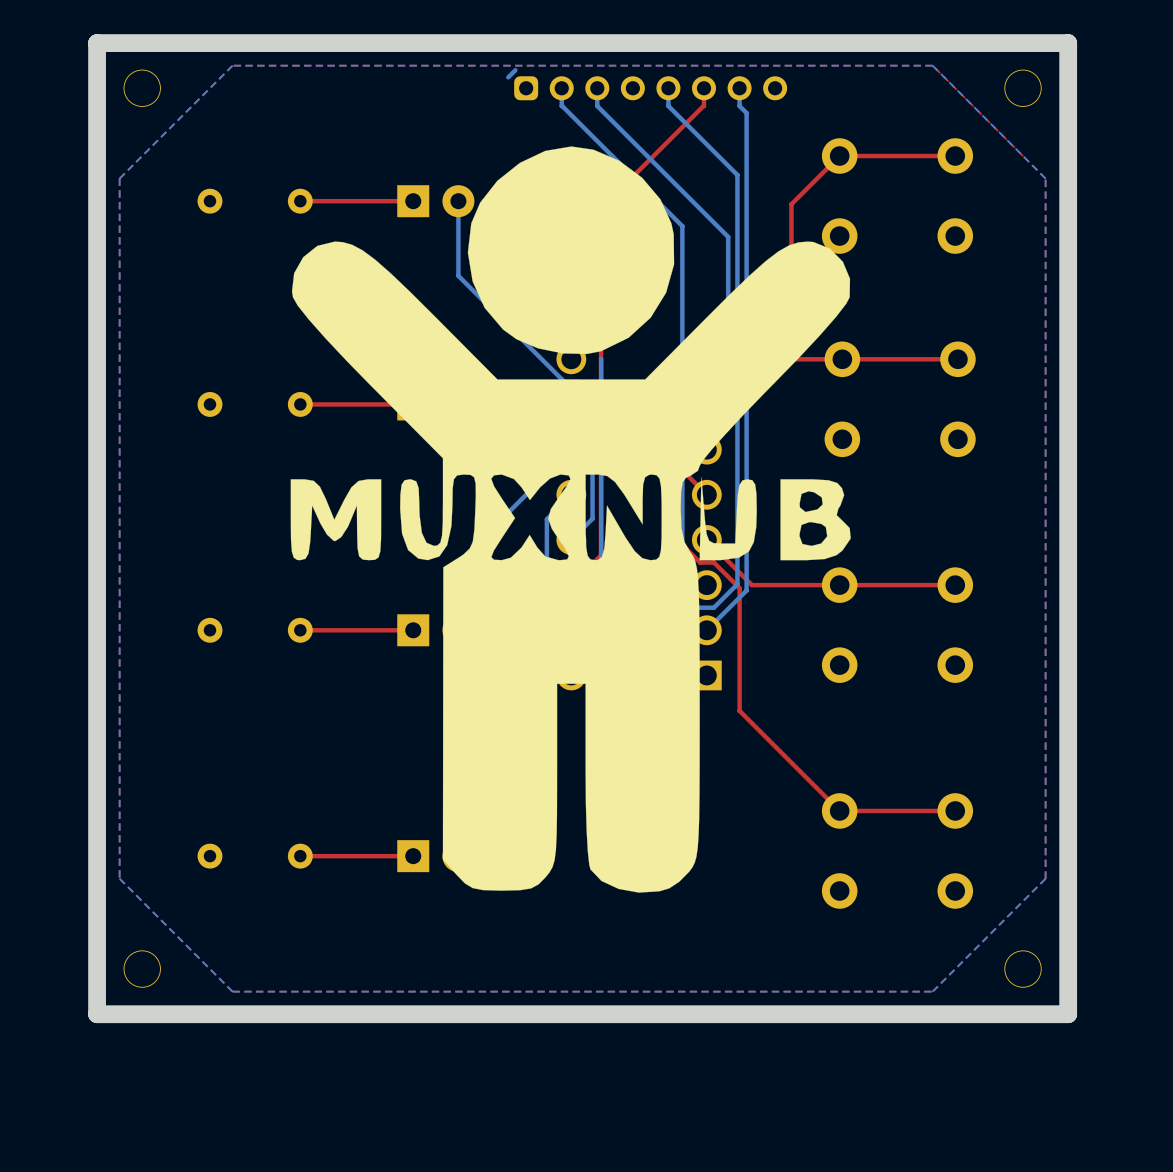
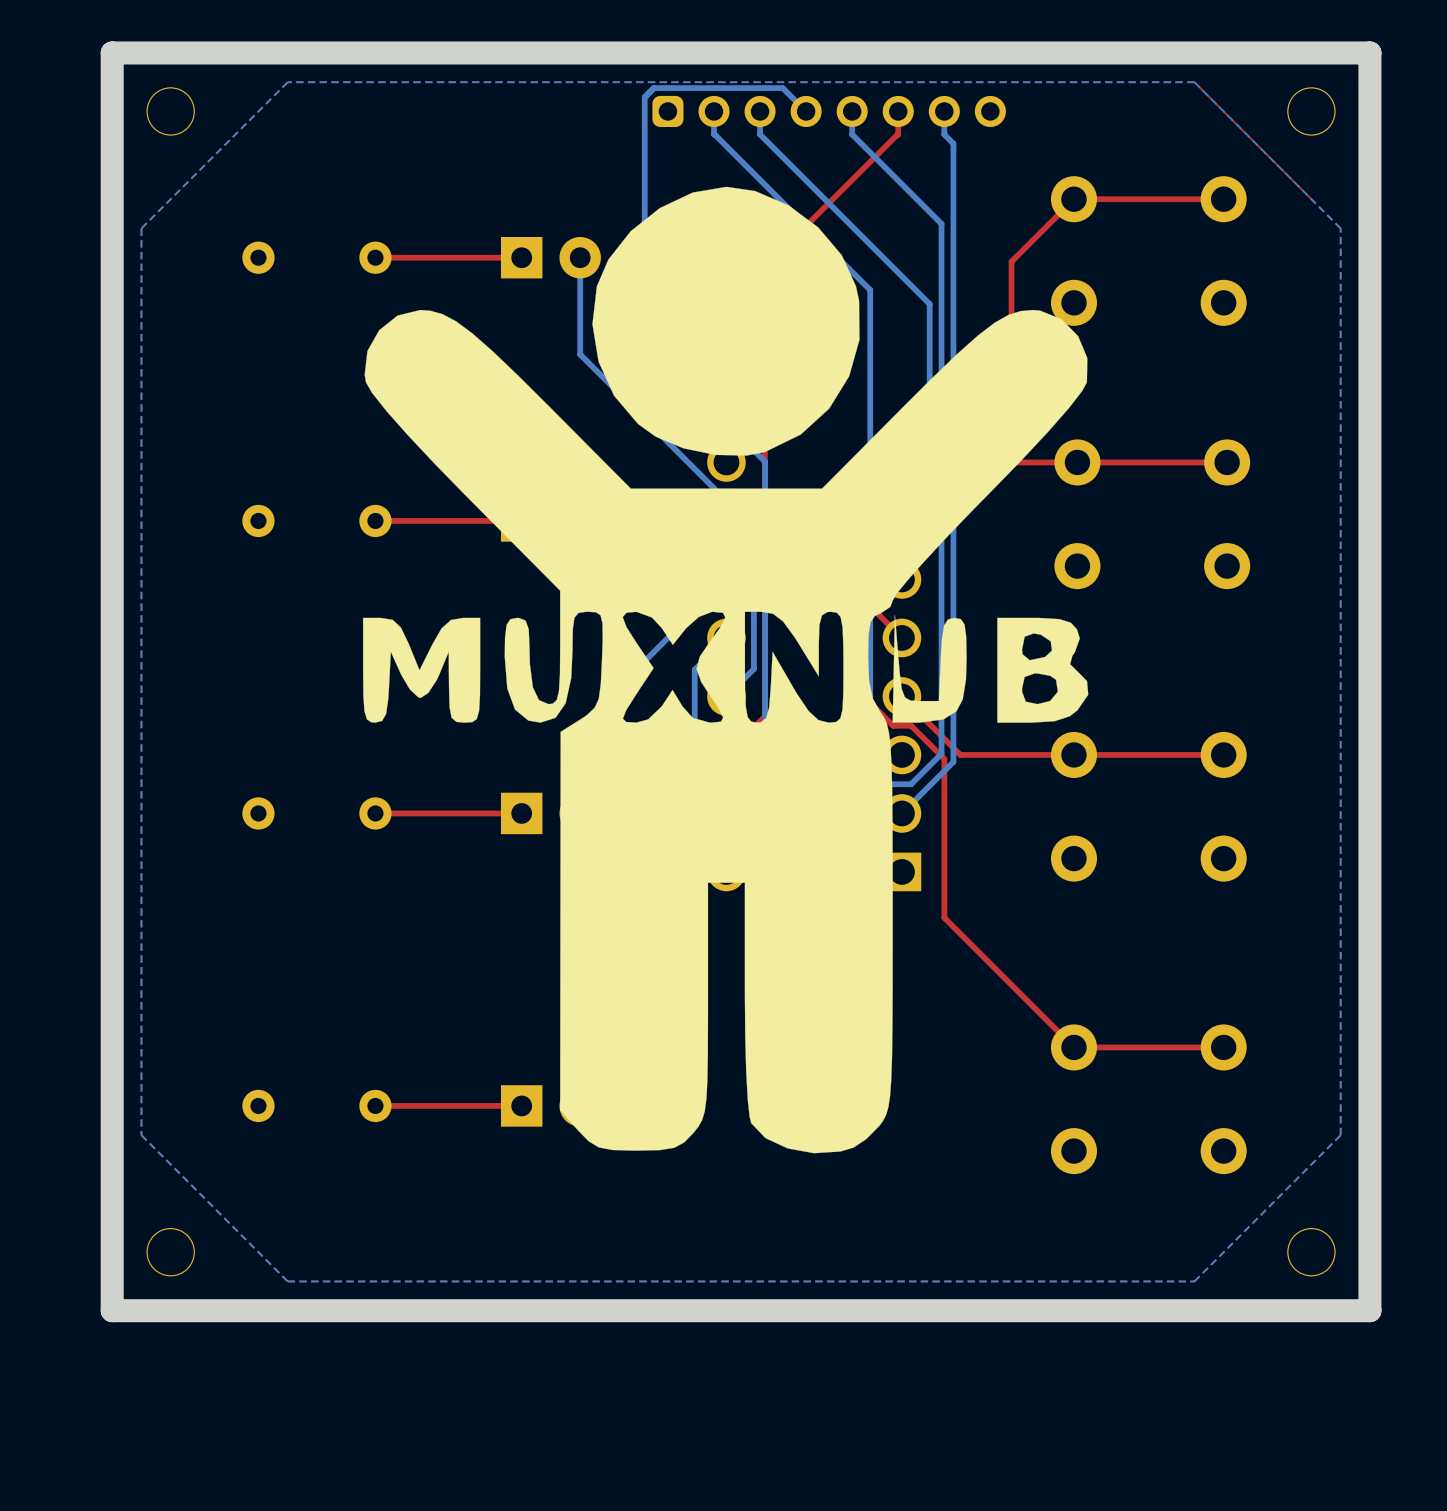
bottom track: none -> (806, 111) (782, 88) (654, 88) (644, 97) (644, 341) (765, 461)

